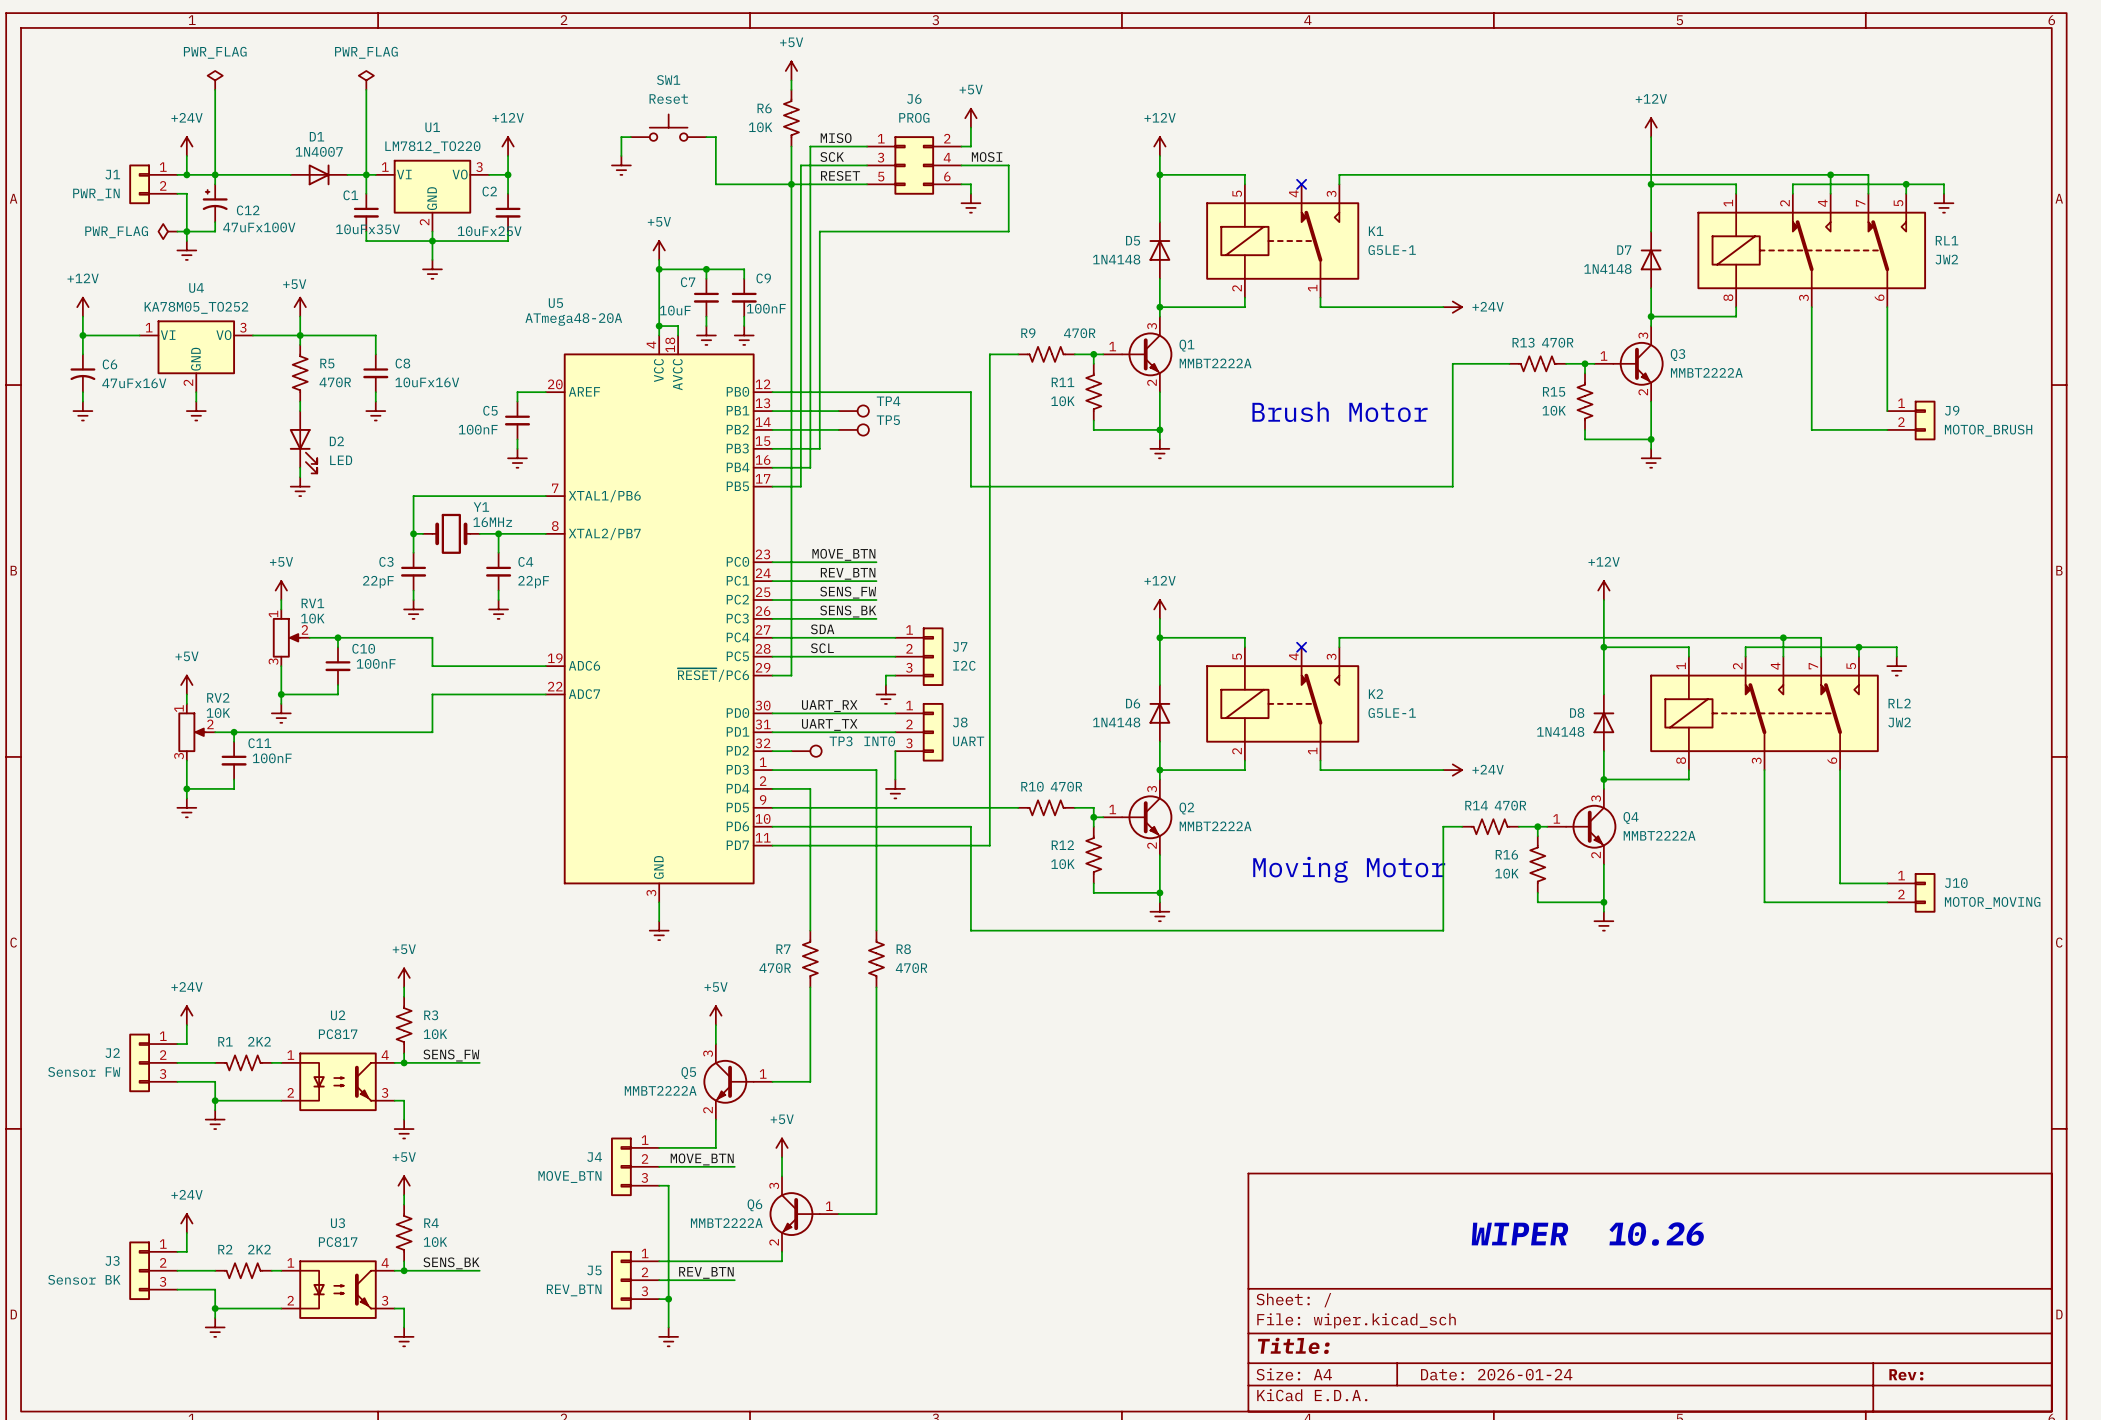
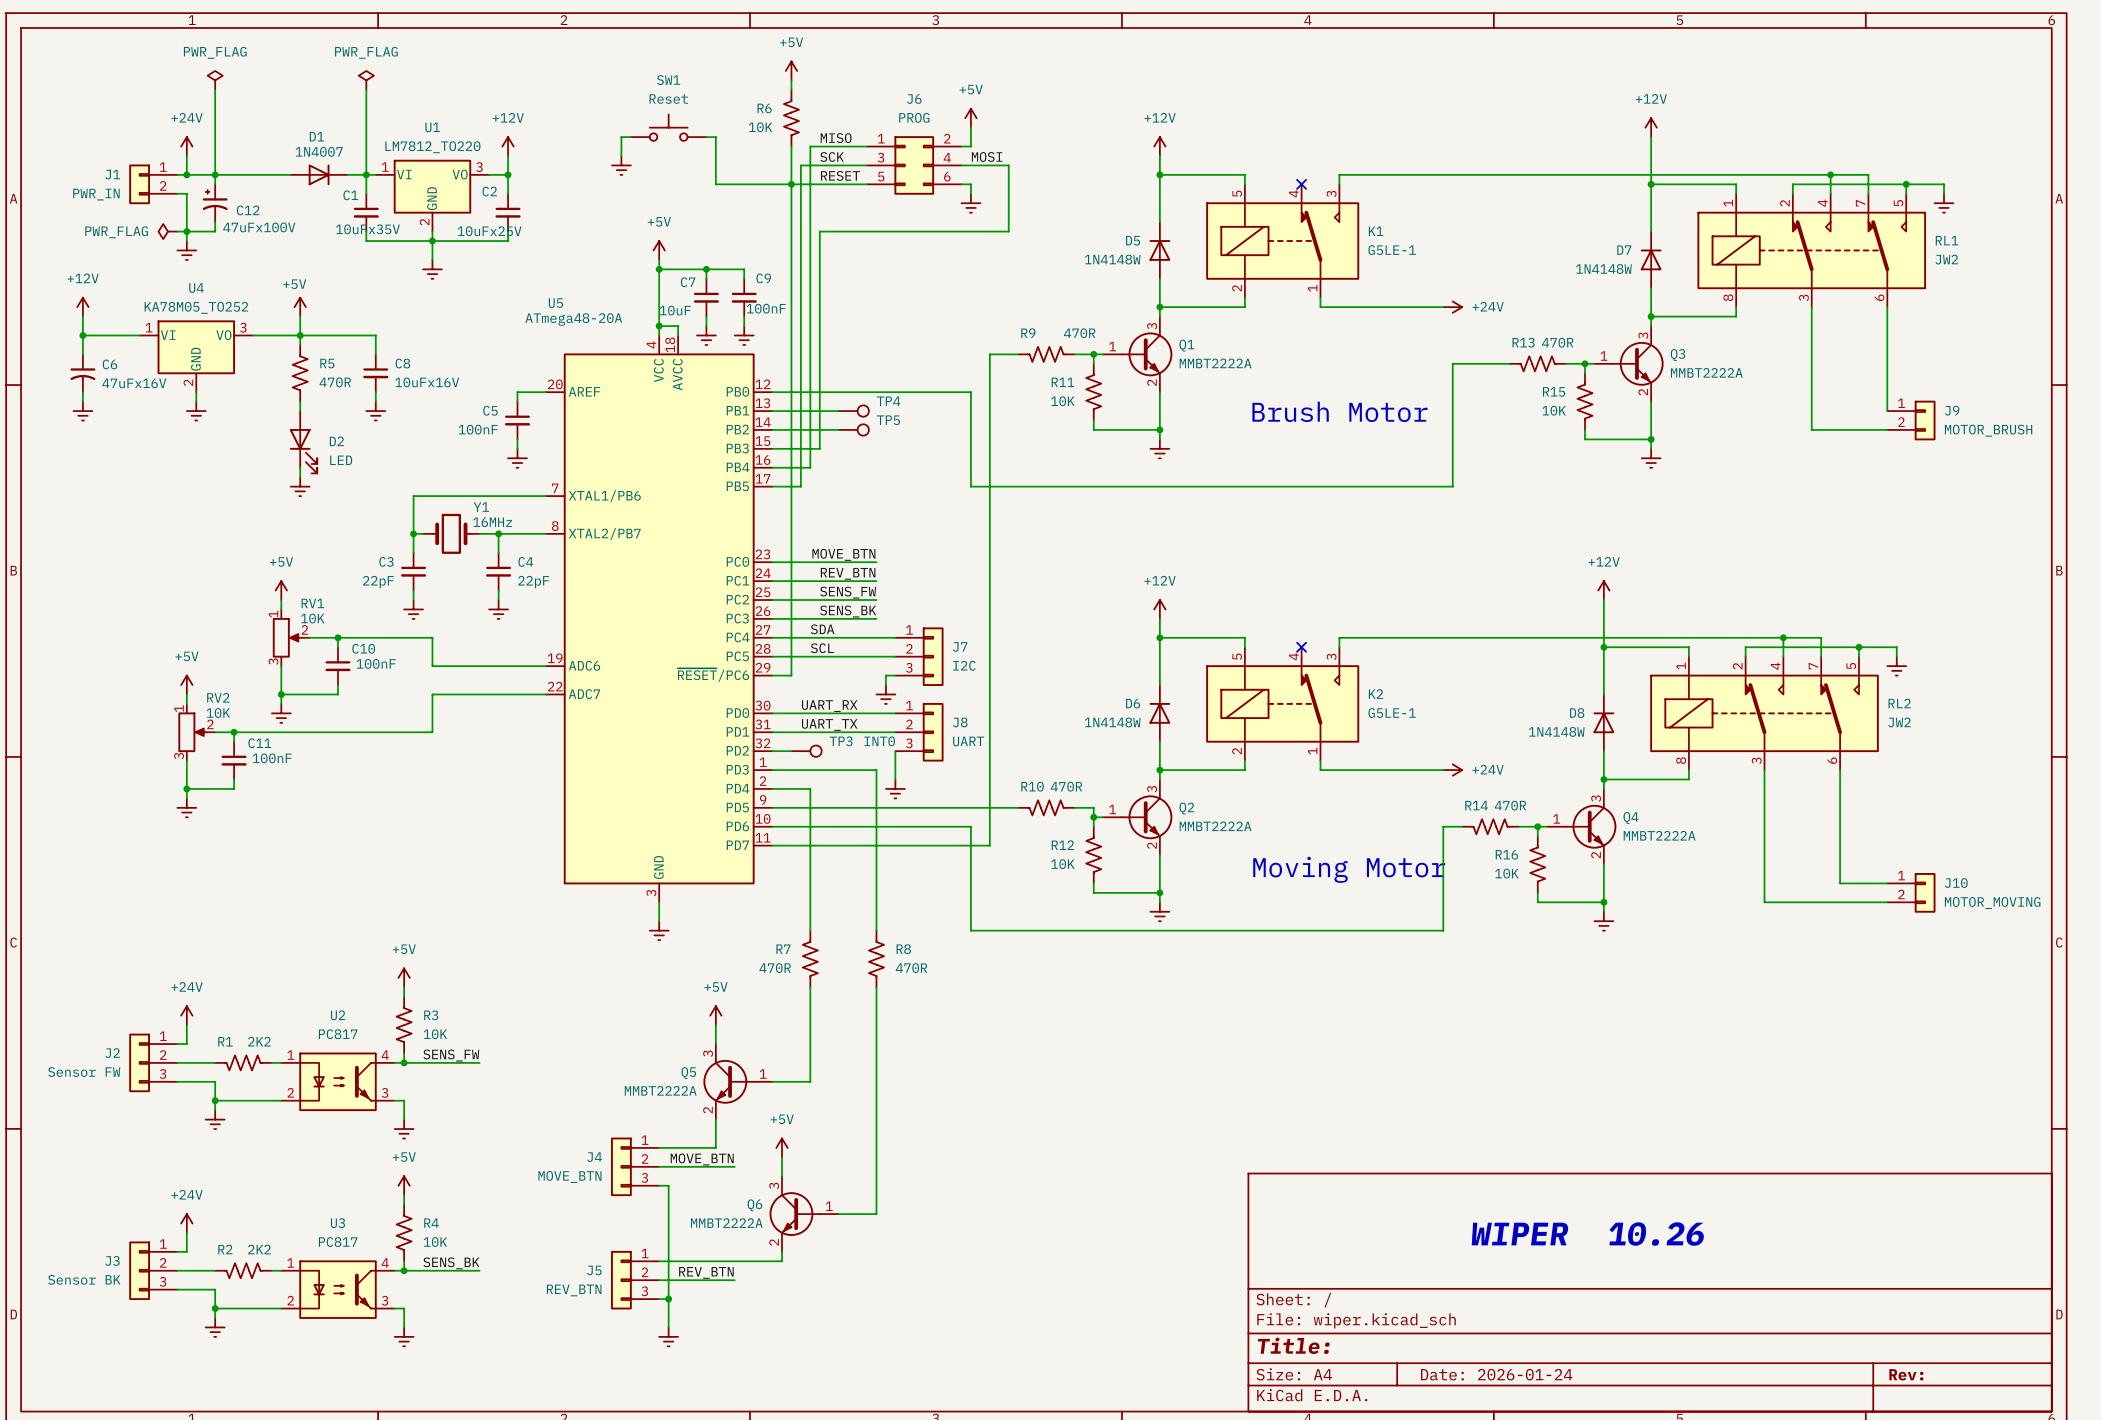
D5 value: 1N4148 (1116, 259) -> 1N4148W (1112, 259)
D7 value: 1N4148 (1607, 269) -> 1N4148W (1603, 269)
D6 value: 1N4148 (1116, 722) -> 1N4148W (1112, 722)
D8 value: 1N4148 (1560, 731) -> 1N4148W (1556, 731)

